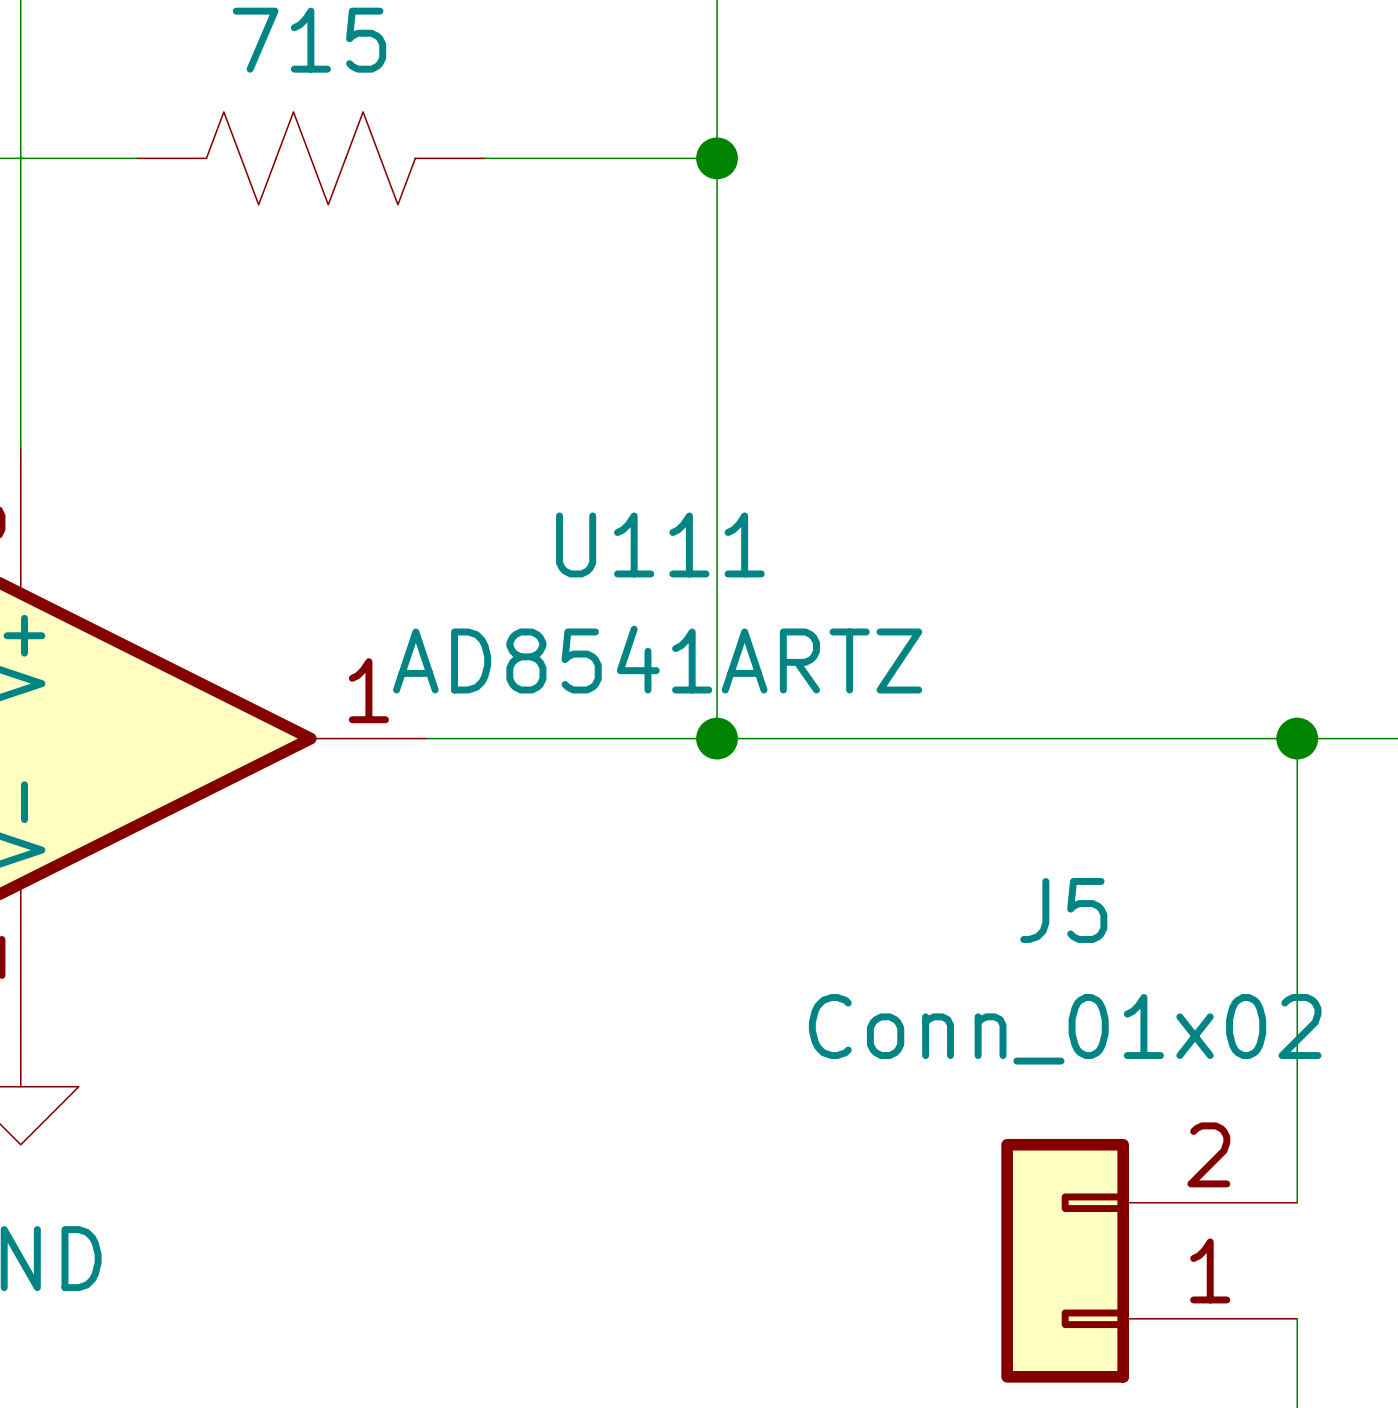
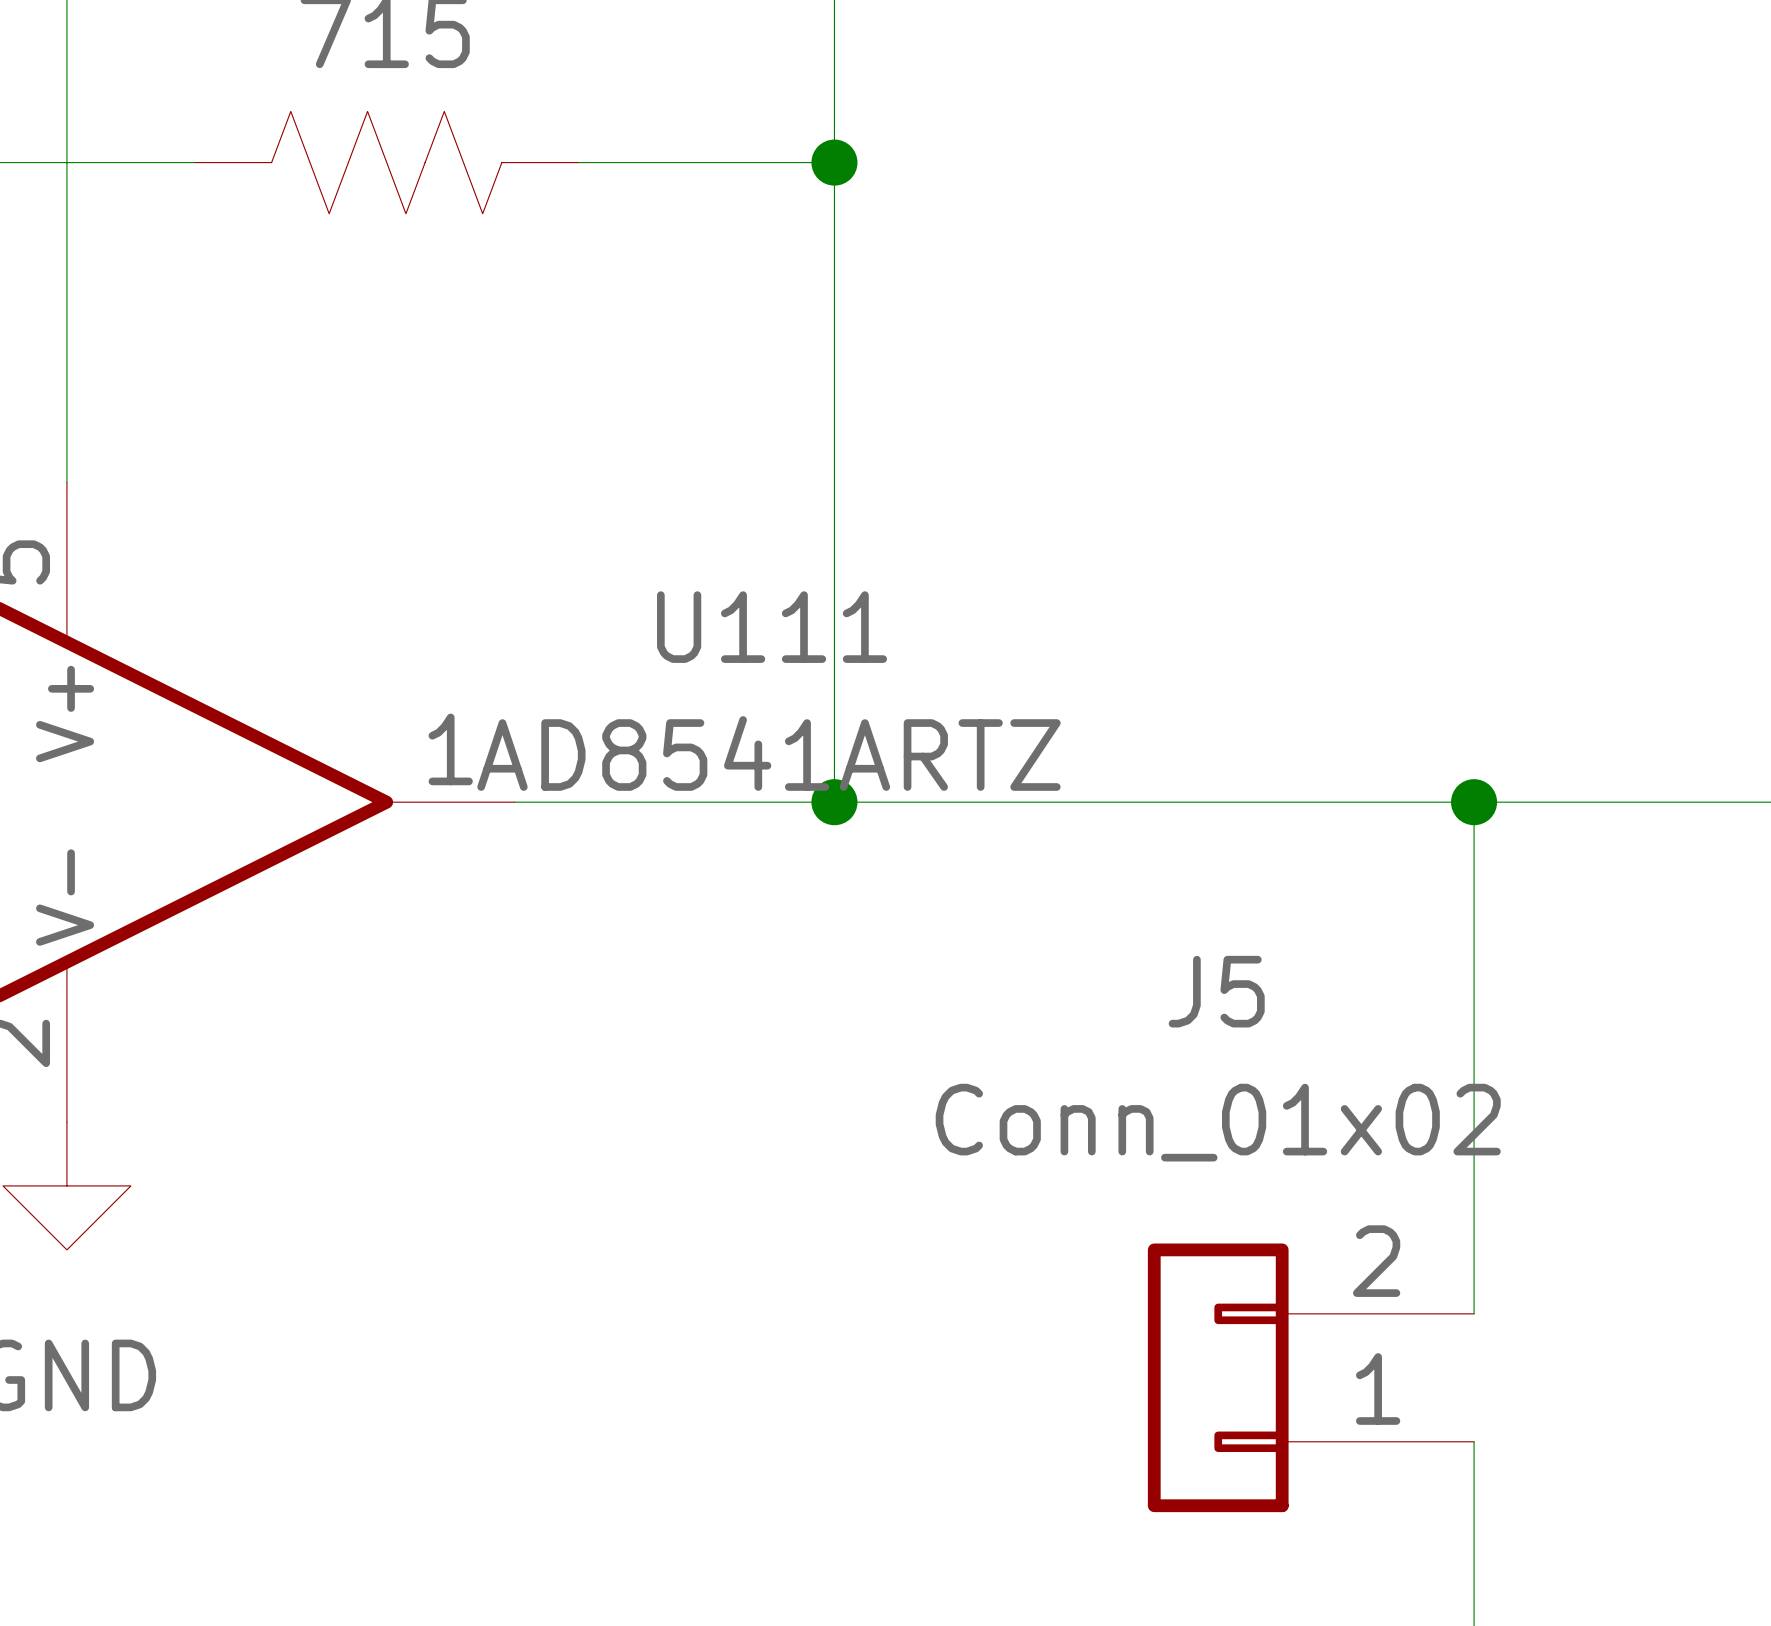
U111 name position: U111 (660, 544) -> U111 (772, 627)
U111 value position: AD8541ARTZ (657, 659) -> AD8541ARTZ (768, 753)

